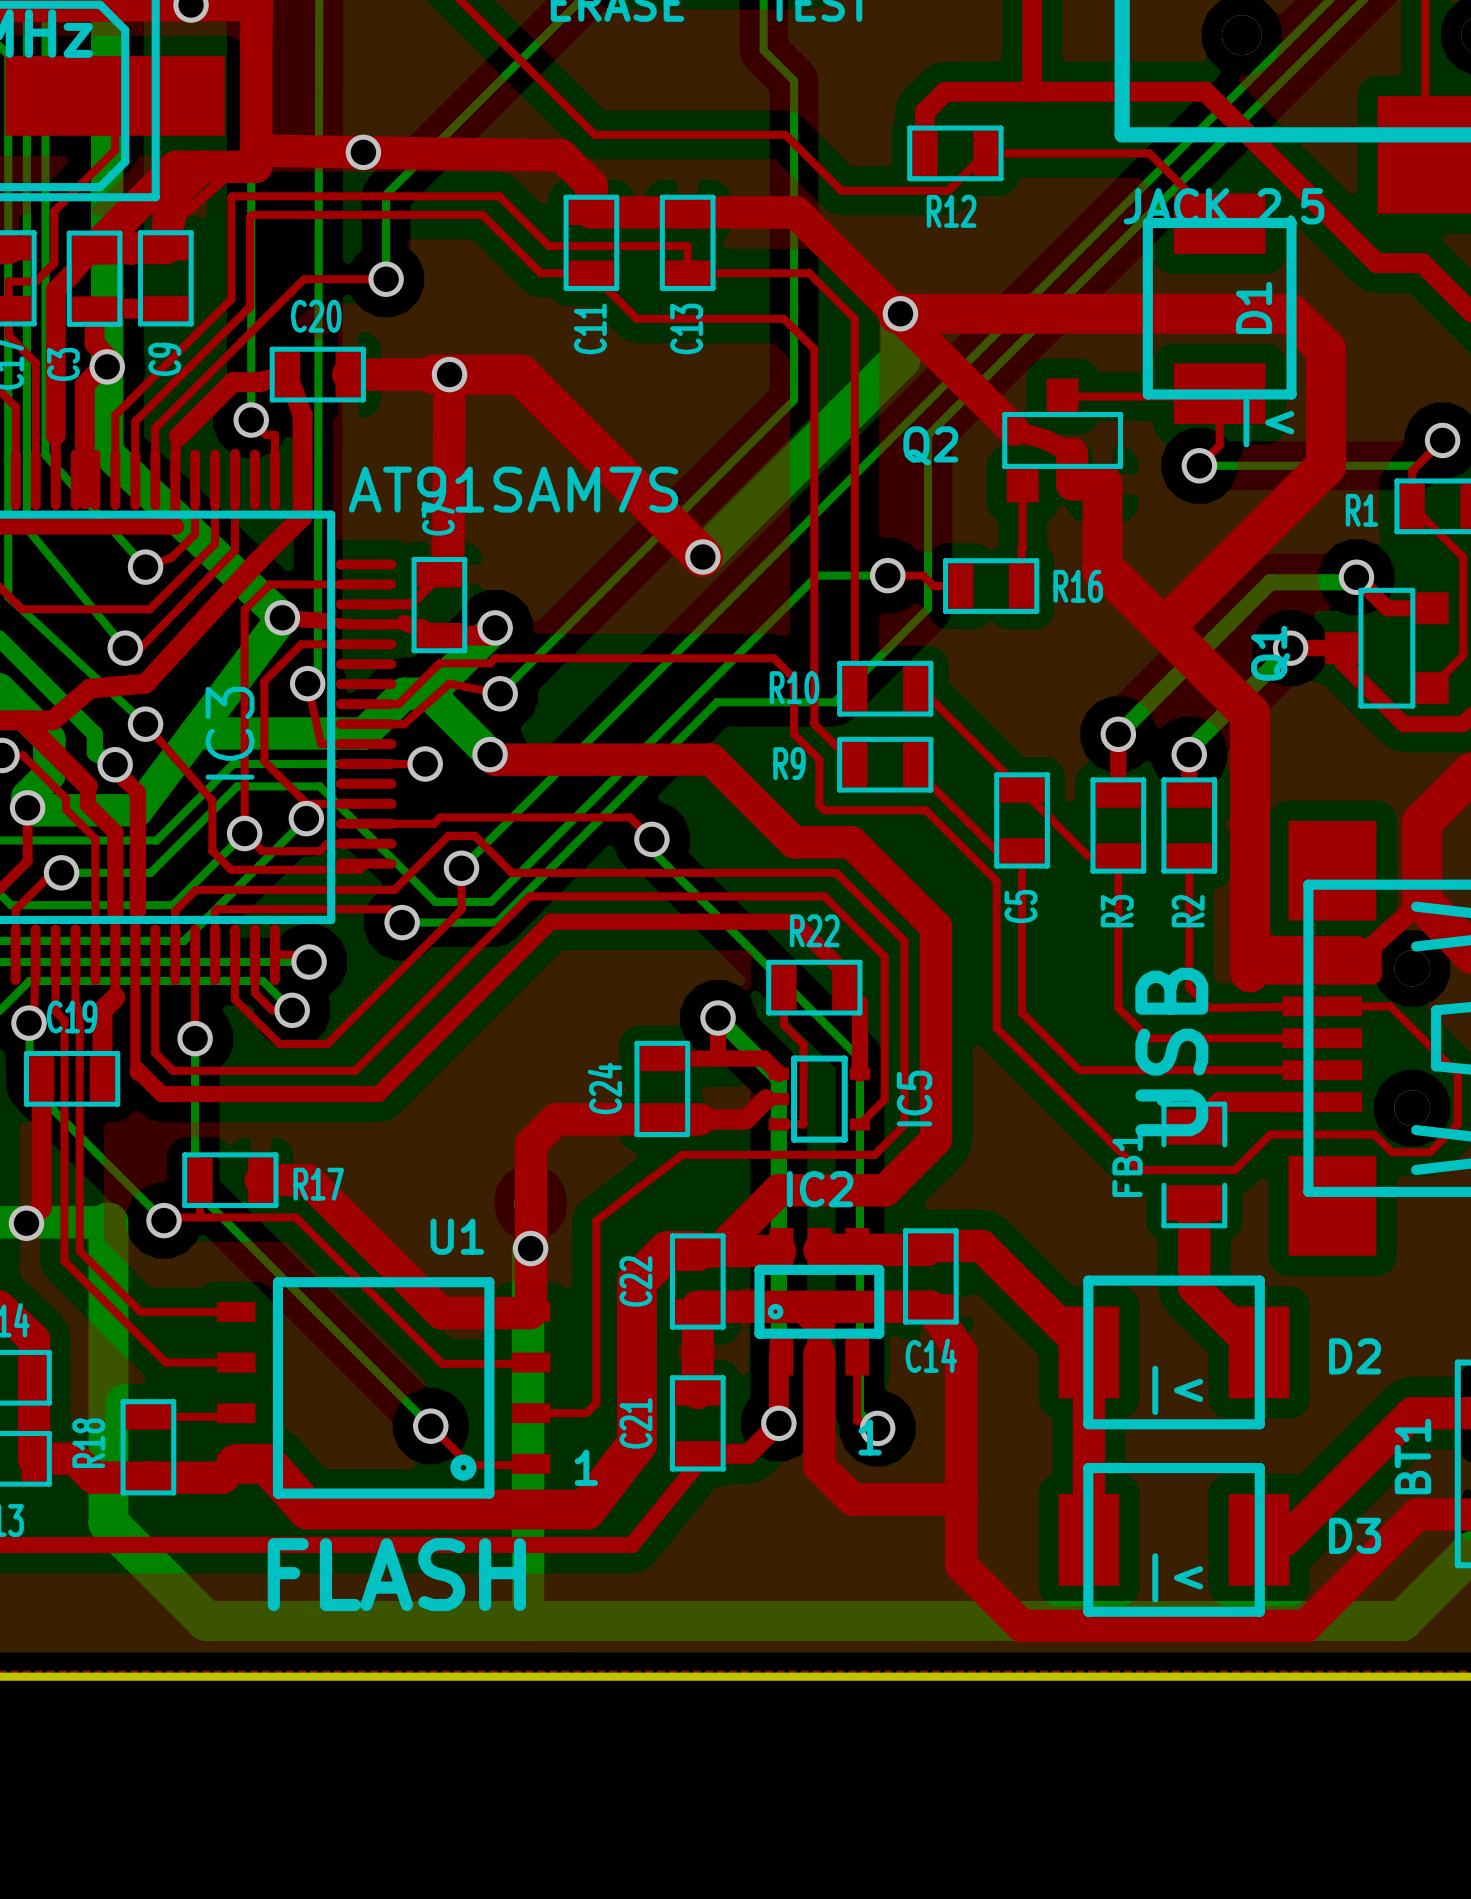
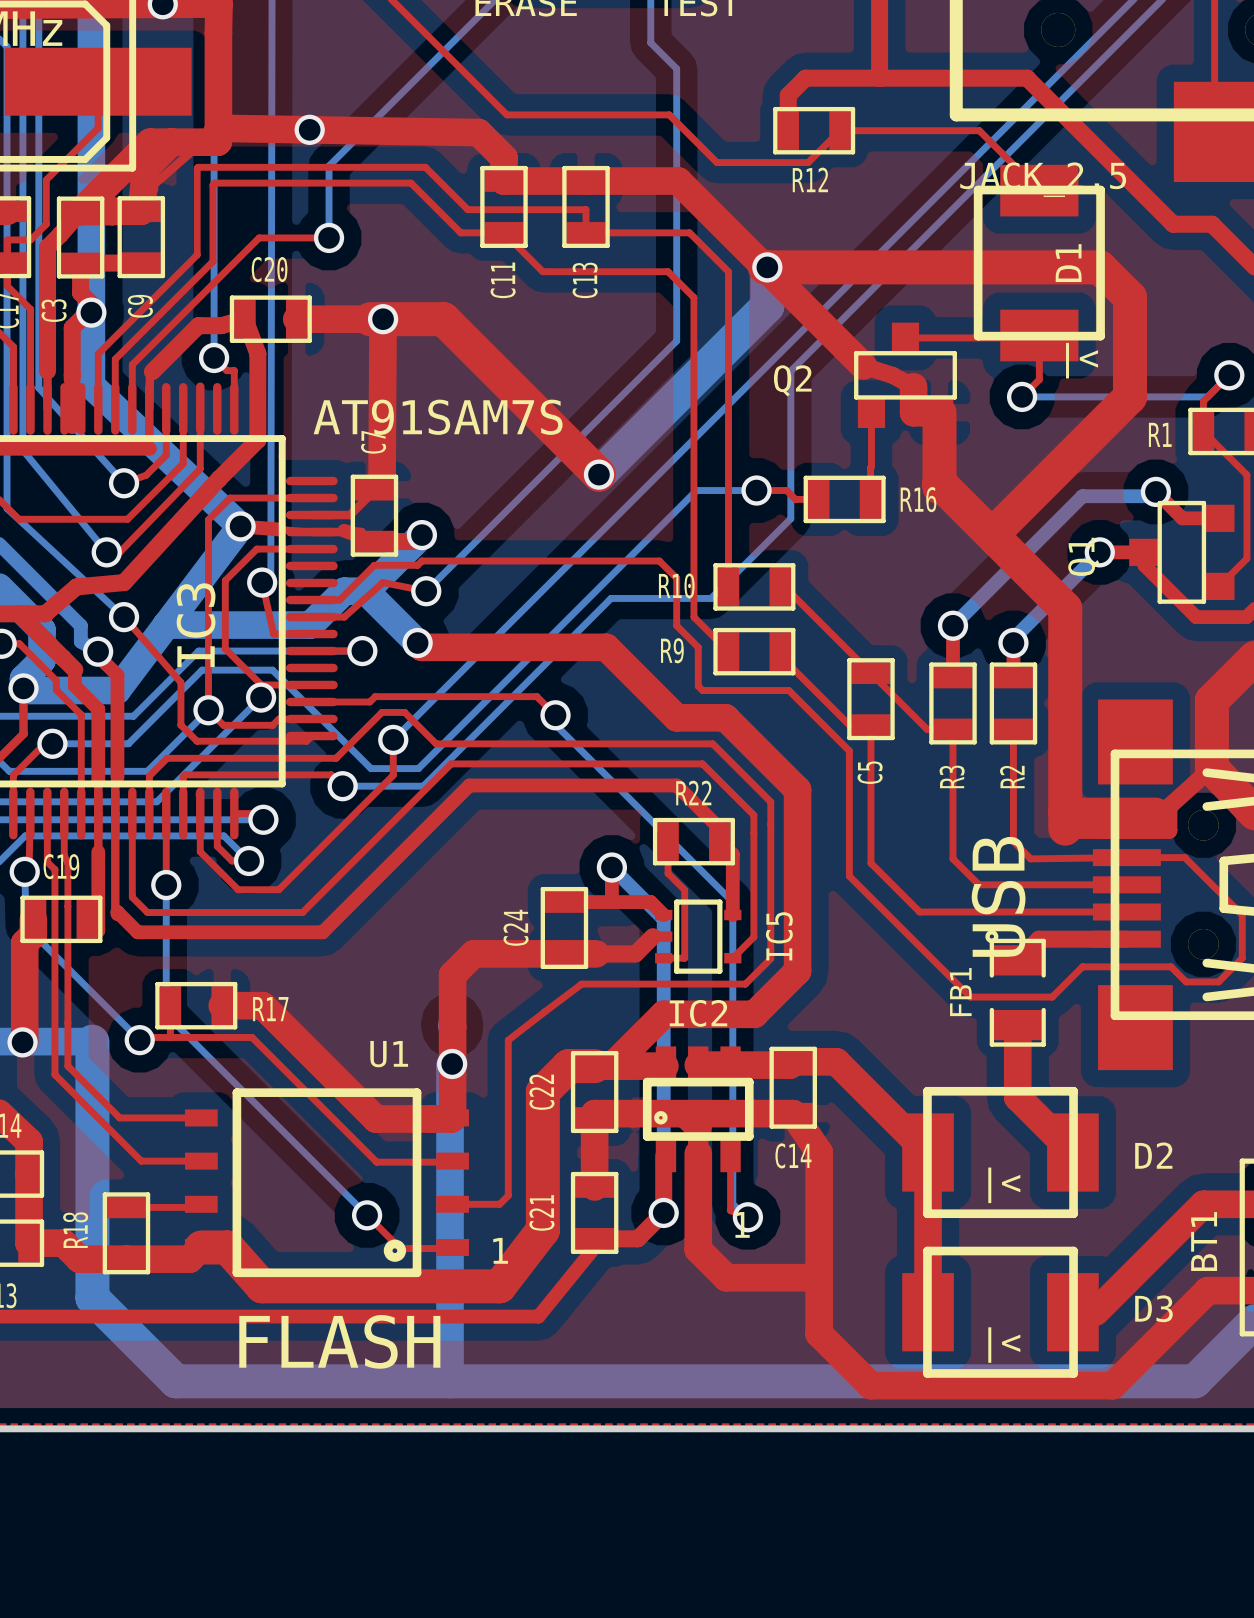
top track: (115, 997) (102, 1010) (102, 1078) -> (98, 850) (98, 930) (85, 919)
top track: none -> (33, 919) (33, 934) (24, 943) (24, 1042)
top track: (41, 1078) (41, 1208) (26, 1223) -> none

